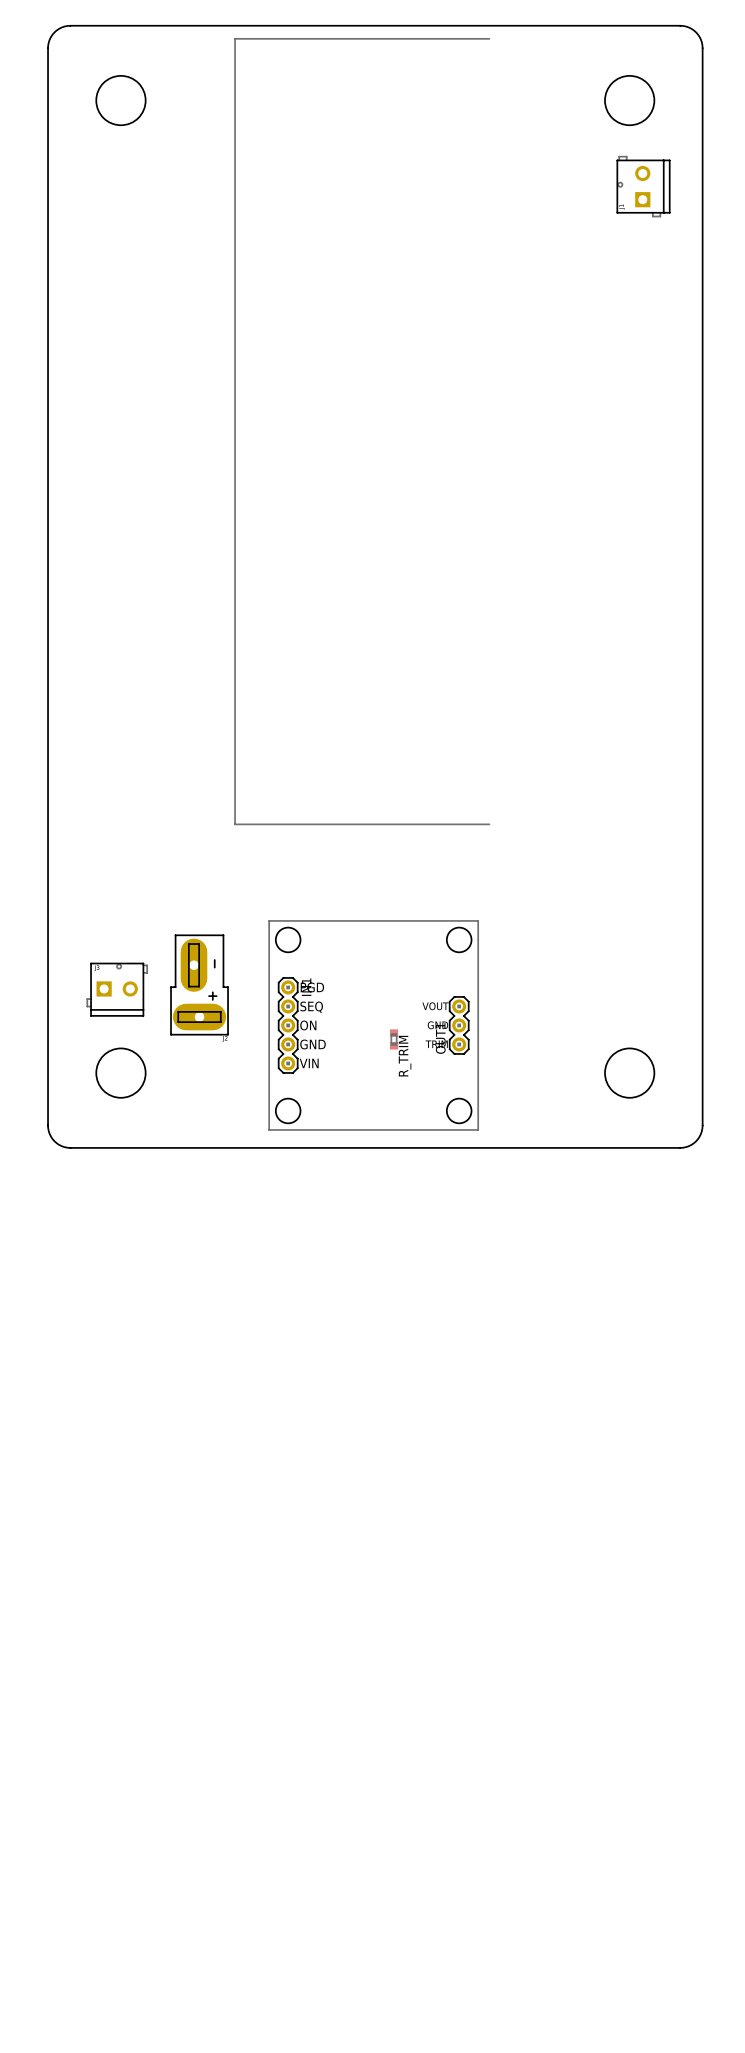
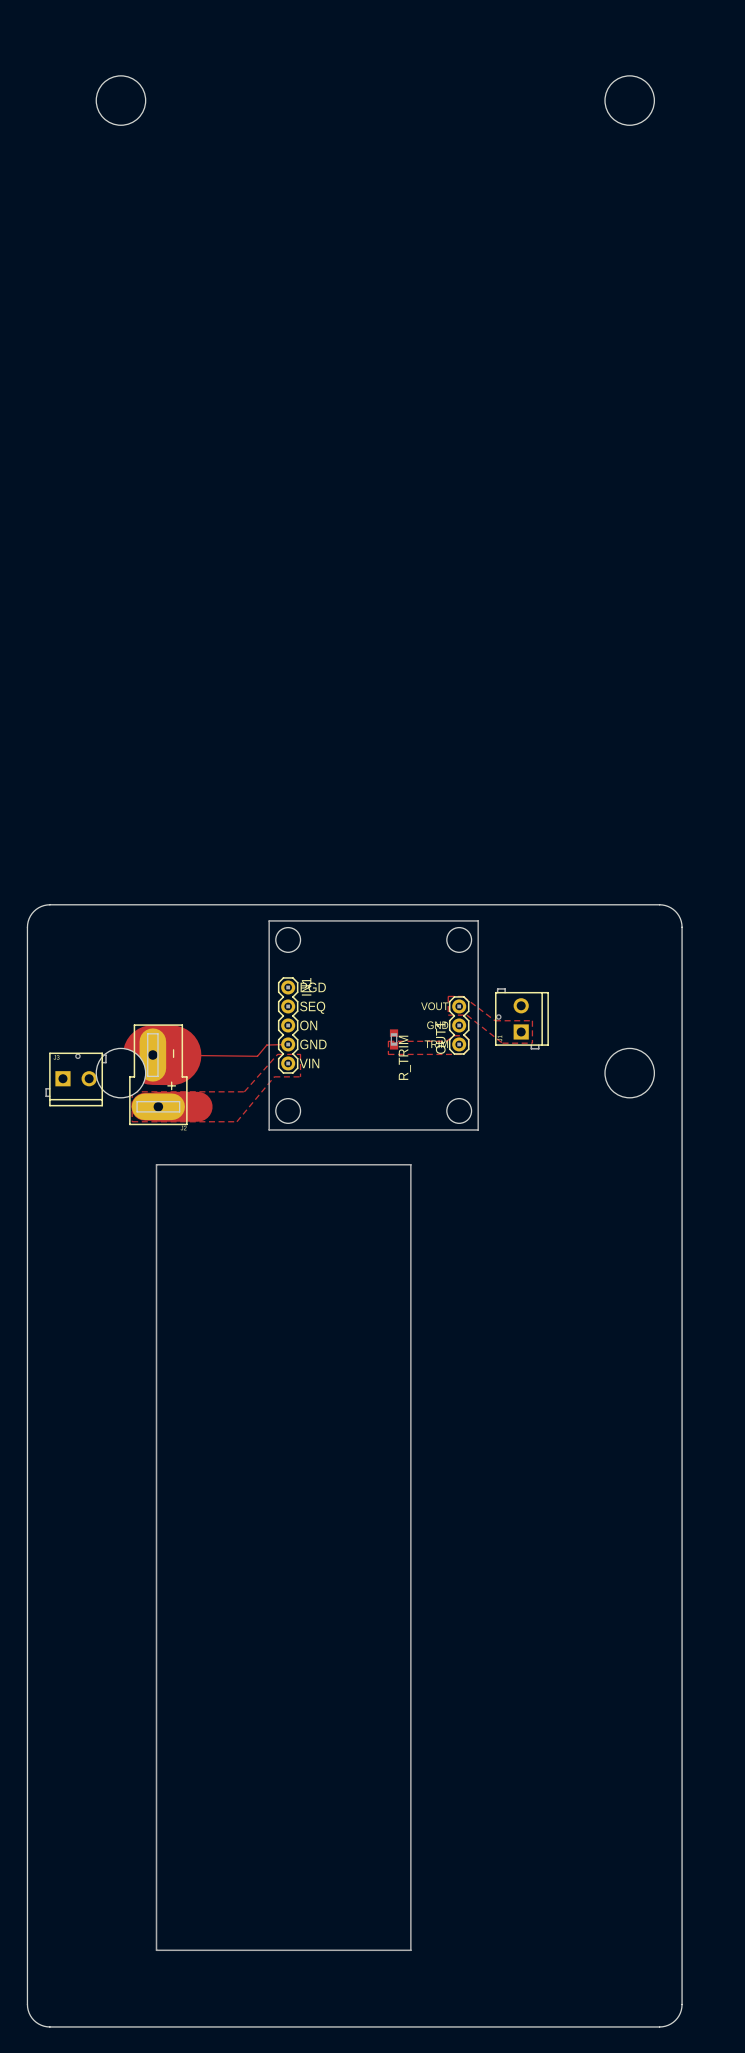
board edge: (70, 25) (680, 25) (691, 28) (699, 36) (702, 48) (702, 1125) (699, 1136) (691, 1144) (680, 1147) (70, 1147) (59, 1144) (51, 1136) (48, 1125) (48, 48) (49, 39) (54, 32) (61, 27) (70, 25) -> none
line: (489, 38) (235, 38) (235, 824) (489, 824) -> none
part position: (643, 186) -> (521, 1018)
board edge: none -> (49, 904) (659, 904) (670, 907) (679, 916) (682, 927) (682, 2004) (679, 2015) (670, 2023) (659, 2026) (49, 2026) (38, 2023) (30, 2015) (27, 2004) (27, 927) (29, 918) (34, 911) (41, 906) (49, 904)
part position: (199, 984) -> (158, 1074)
part position: (117, 989) -> (76, 1079)
zone outline: none -> (448, 996) (448, 1015) (466, 1015) (502, 1043) (532, 1043) (532, 1020) (495, 1020) (463, 996) (448, 996)
zone outline: none -> (453, 1035) (446, 1041) (388, 1041) (388, 1054) (463, 1054) (468, 1048) (468, 1039) (465, 1035) (453, 1035)
track: none -> (288, 1044) (266, 1045) (257, 1056) (152, 1055)
zone outline: none -> (277, 1054) (300, 1054) (300, 1076) (274, 1076) (236, 1121) (132, 1121) (132, 1091) (244, 1091) (277, 1054)
track: none -> (145, 1106) (201, 1106)
line: none -> (156, 1164) (410, 1164) (410, 1950) (156, 1950) (156, 1164)

